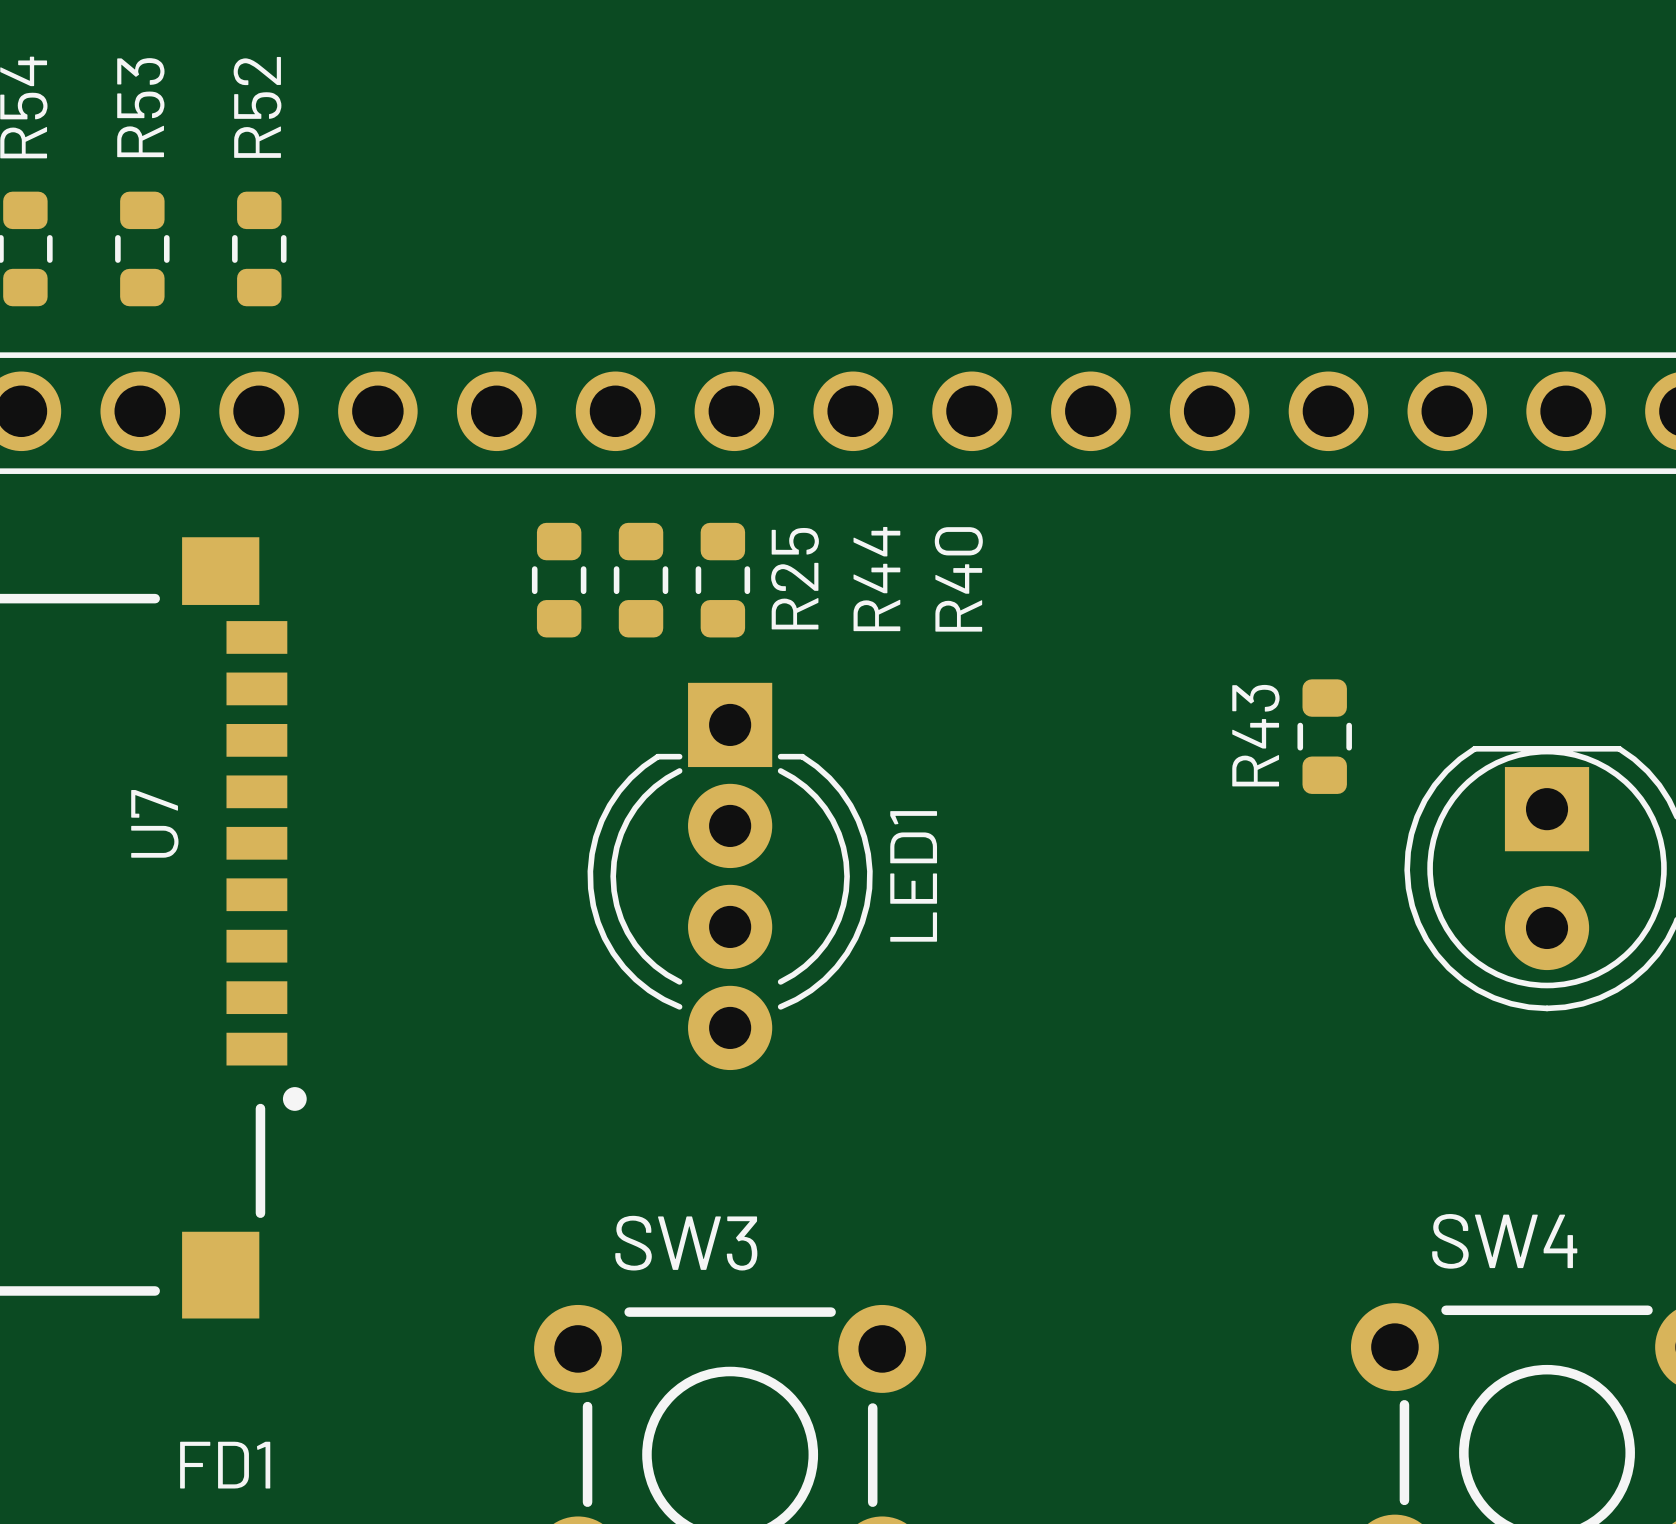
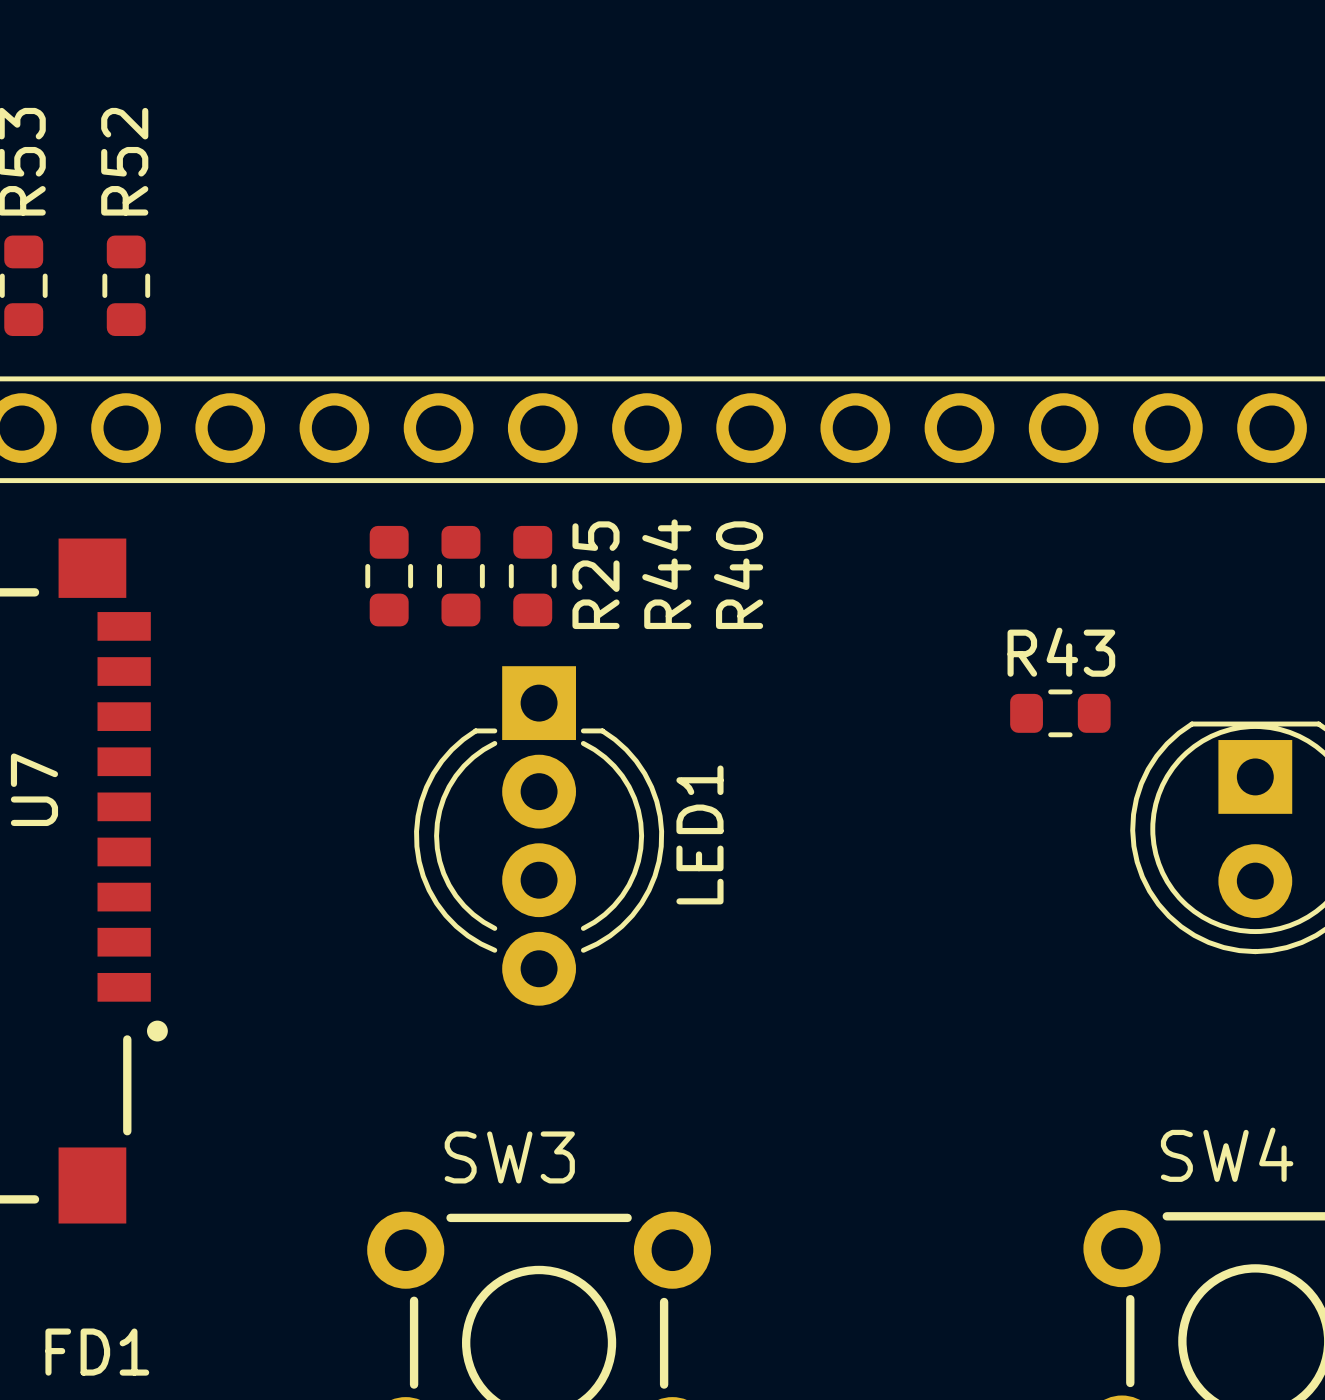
R43 rotation: 0° (1324, 736) -> 90° clockwise (1060, 713)

